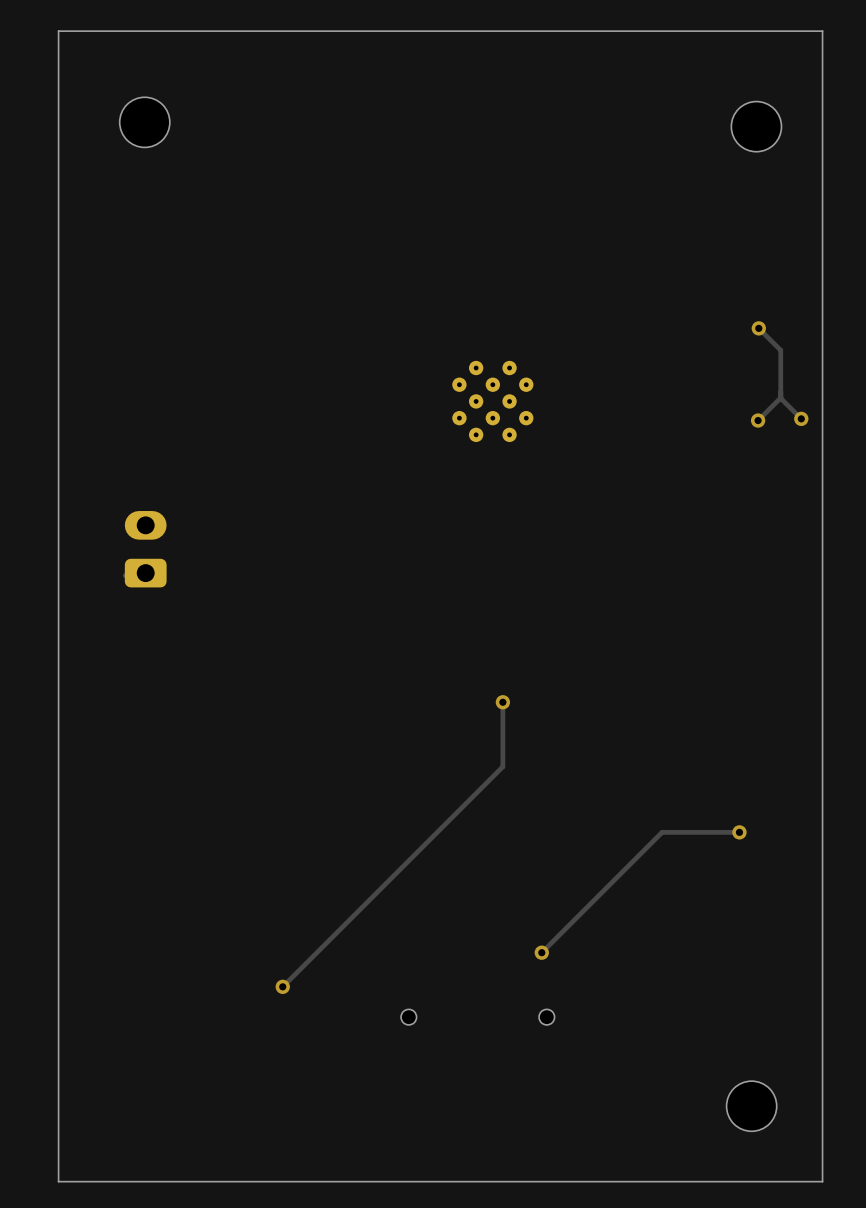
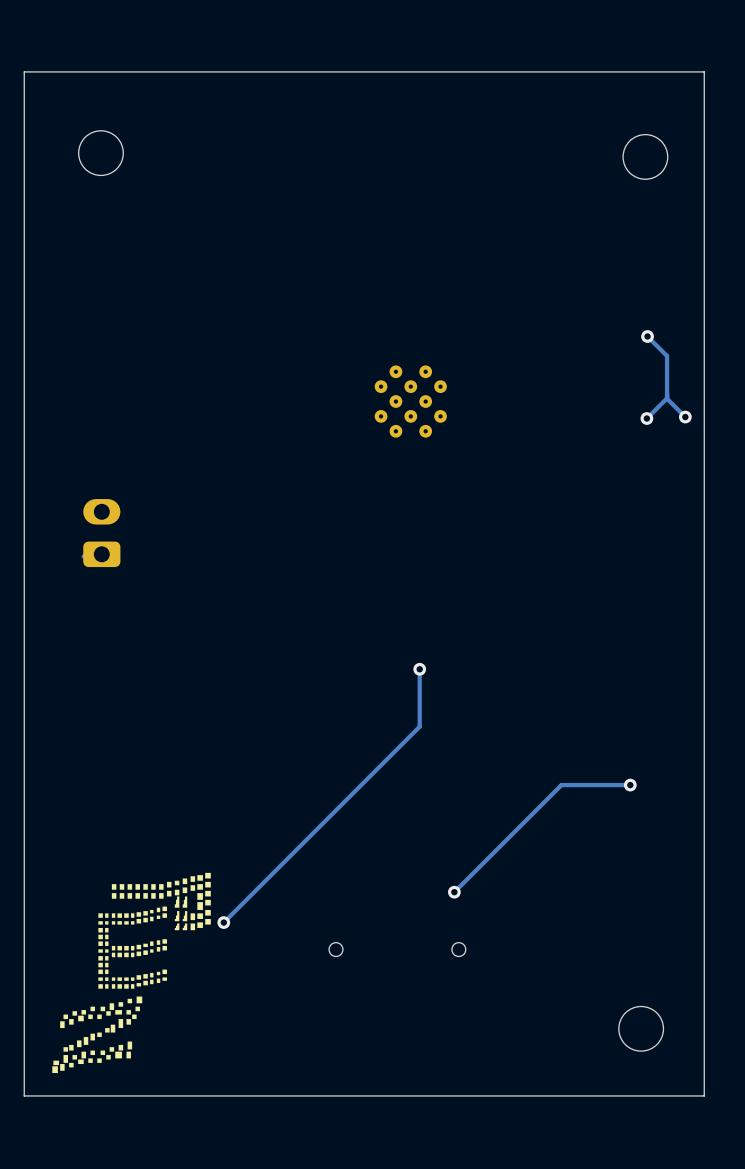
drawing: none -> [52, 872, 211, 1074]

